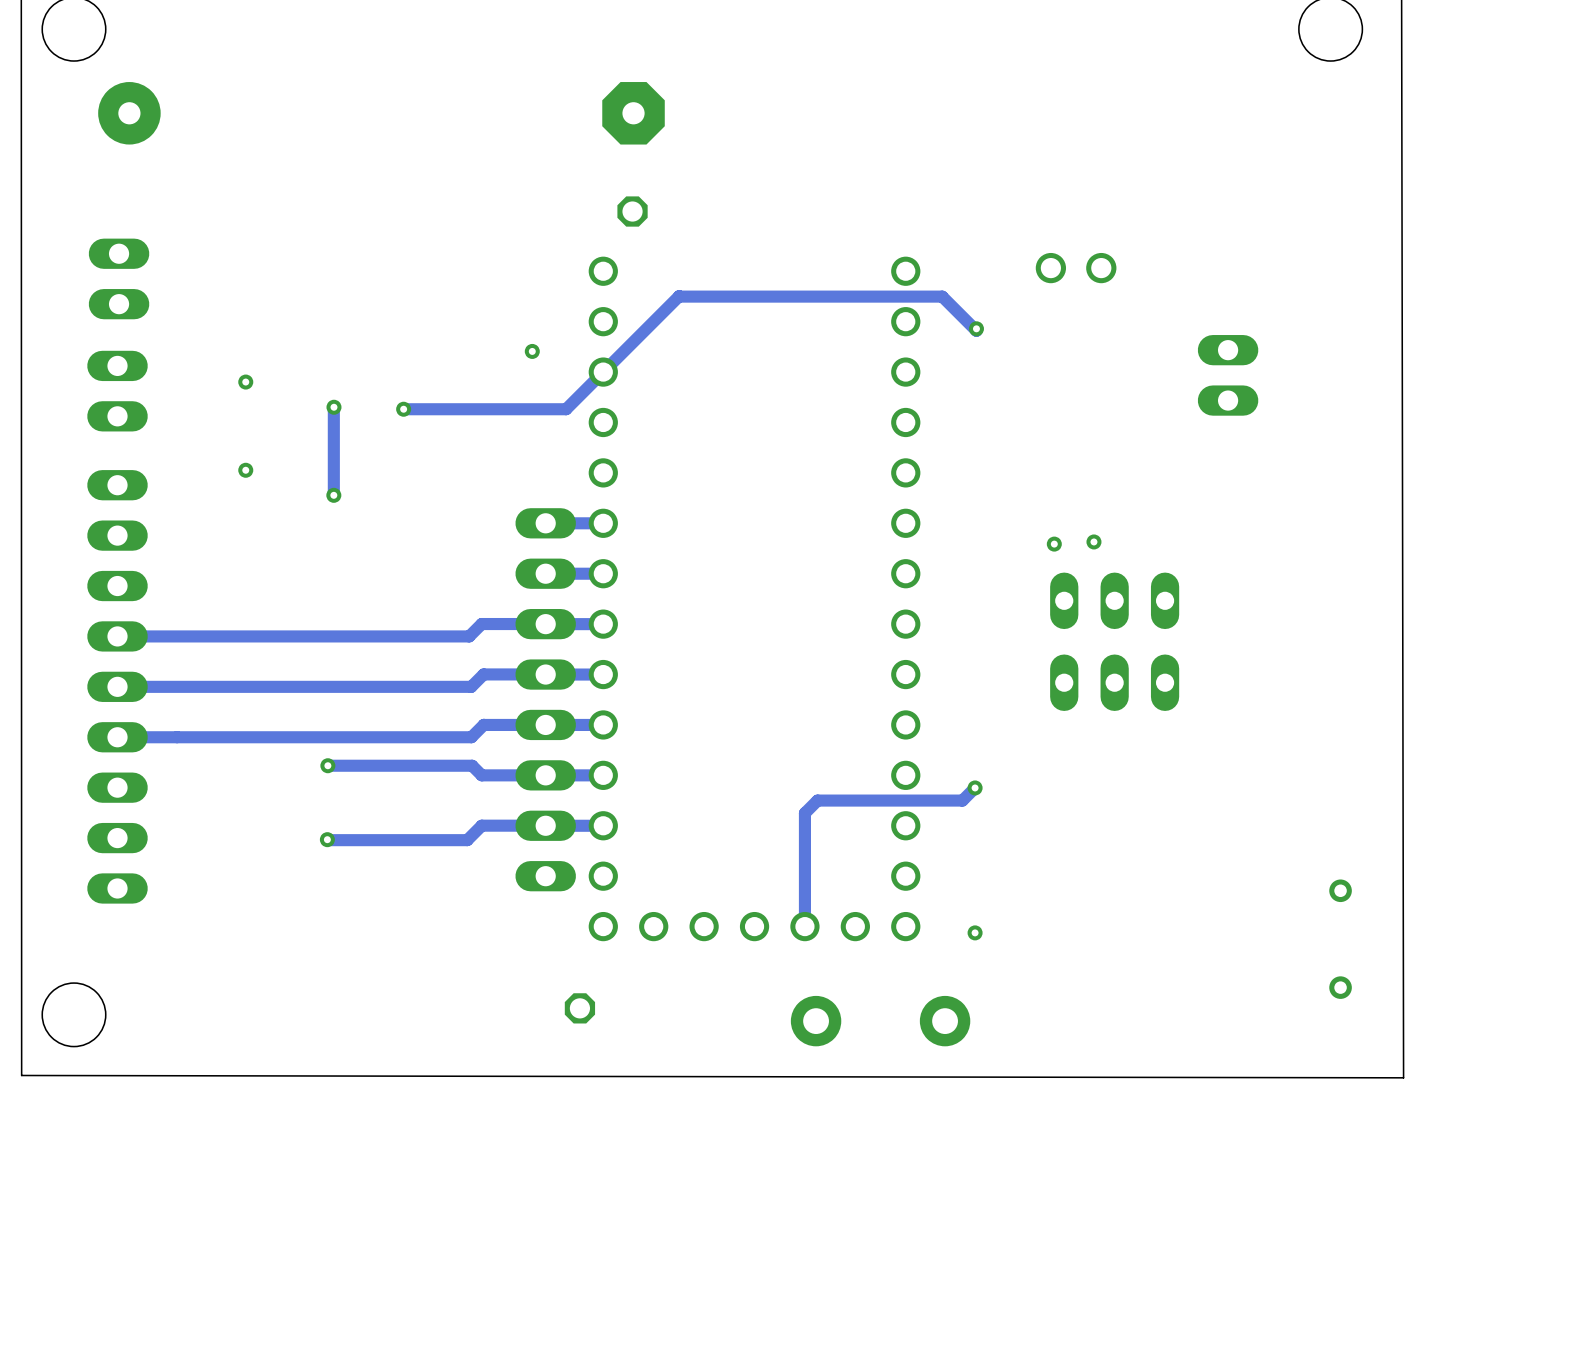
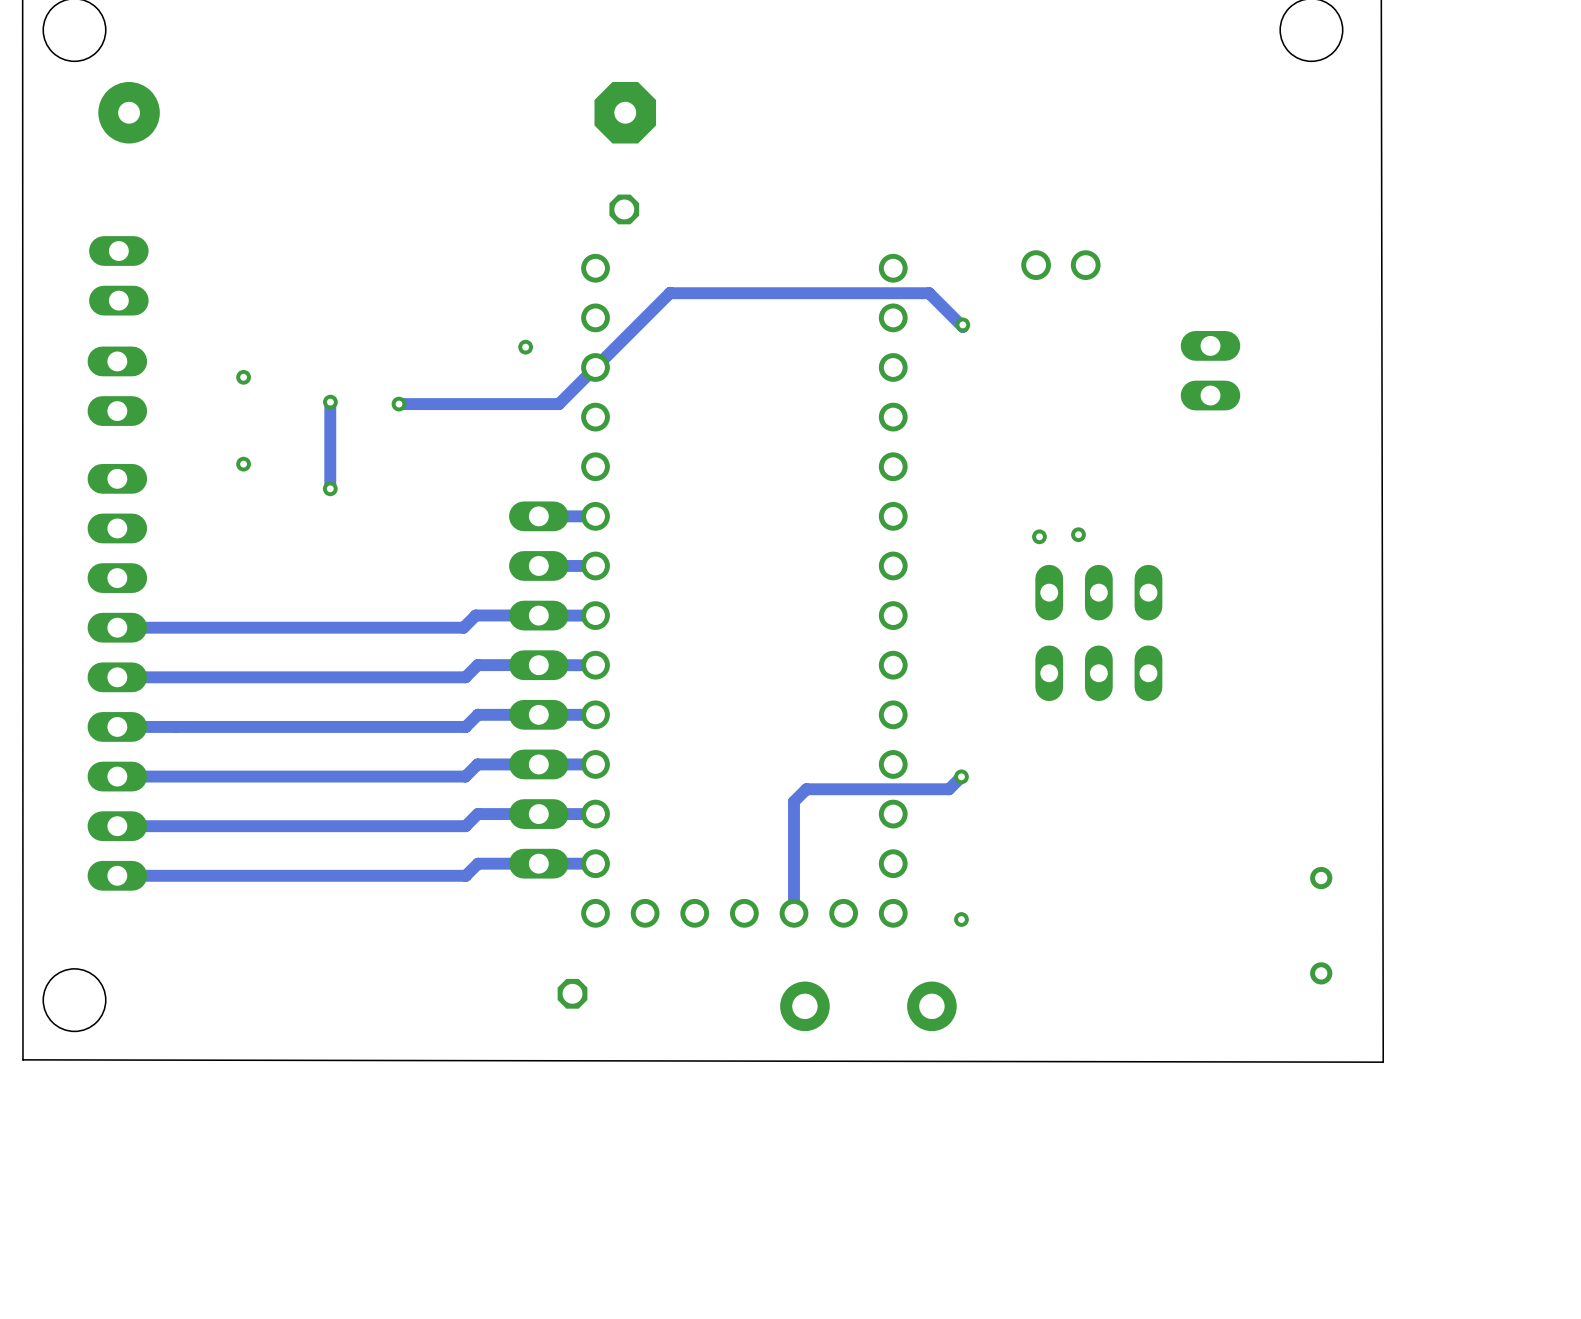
track: (327, 765) (472, 765) (483, 775) -> (117, 776) (465, 776) (477, 764)
via: (327, 765) -> none
track: (542, 825) (481, 825) (467, 840) (327, 839) -> (535, 814) (477, 814) (465, 826) (117, 826)
via: (327, 839) -> none
track: none -> (595, 863) (477, 863) (465, 875) (117, 875)

